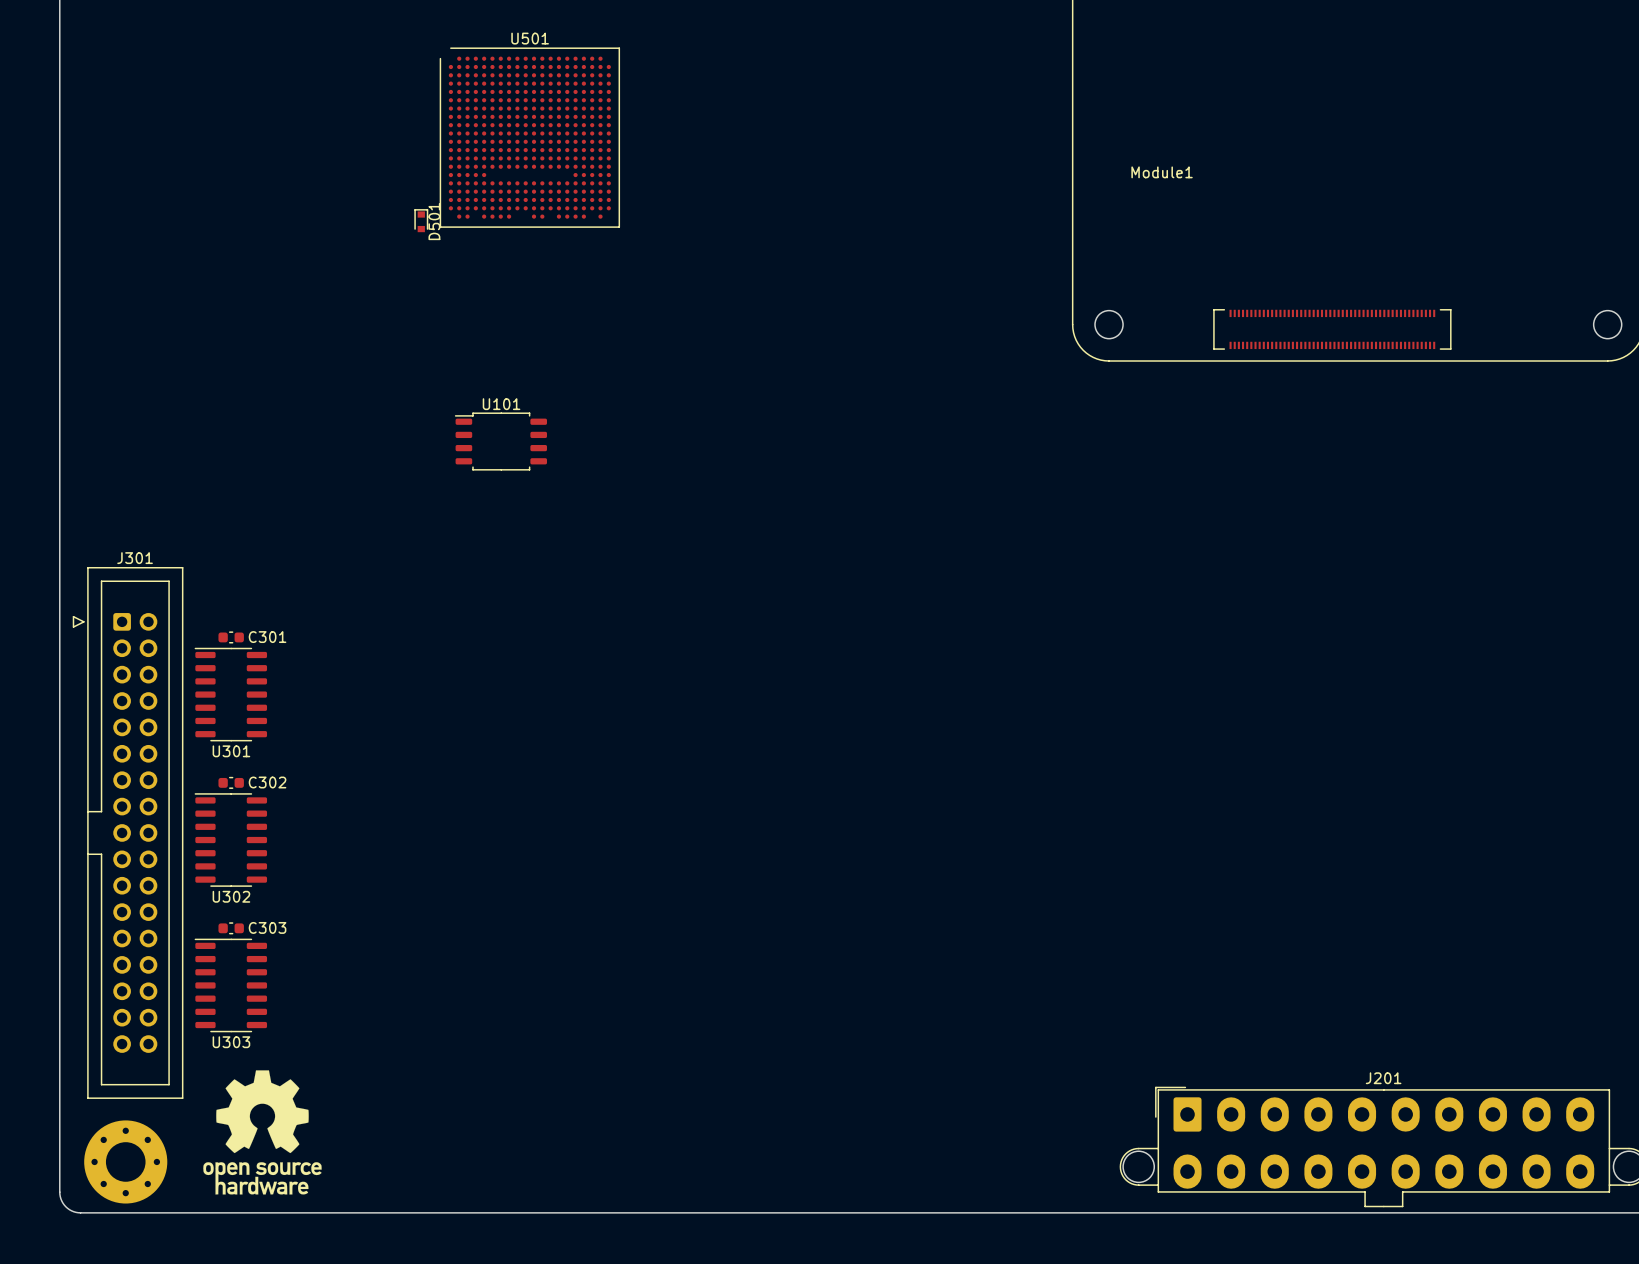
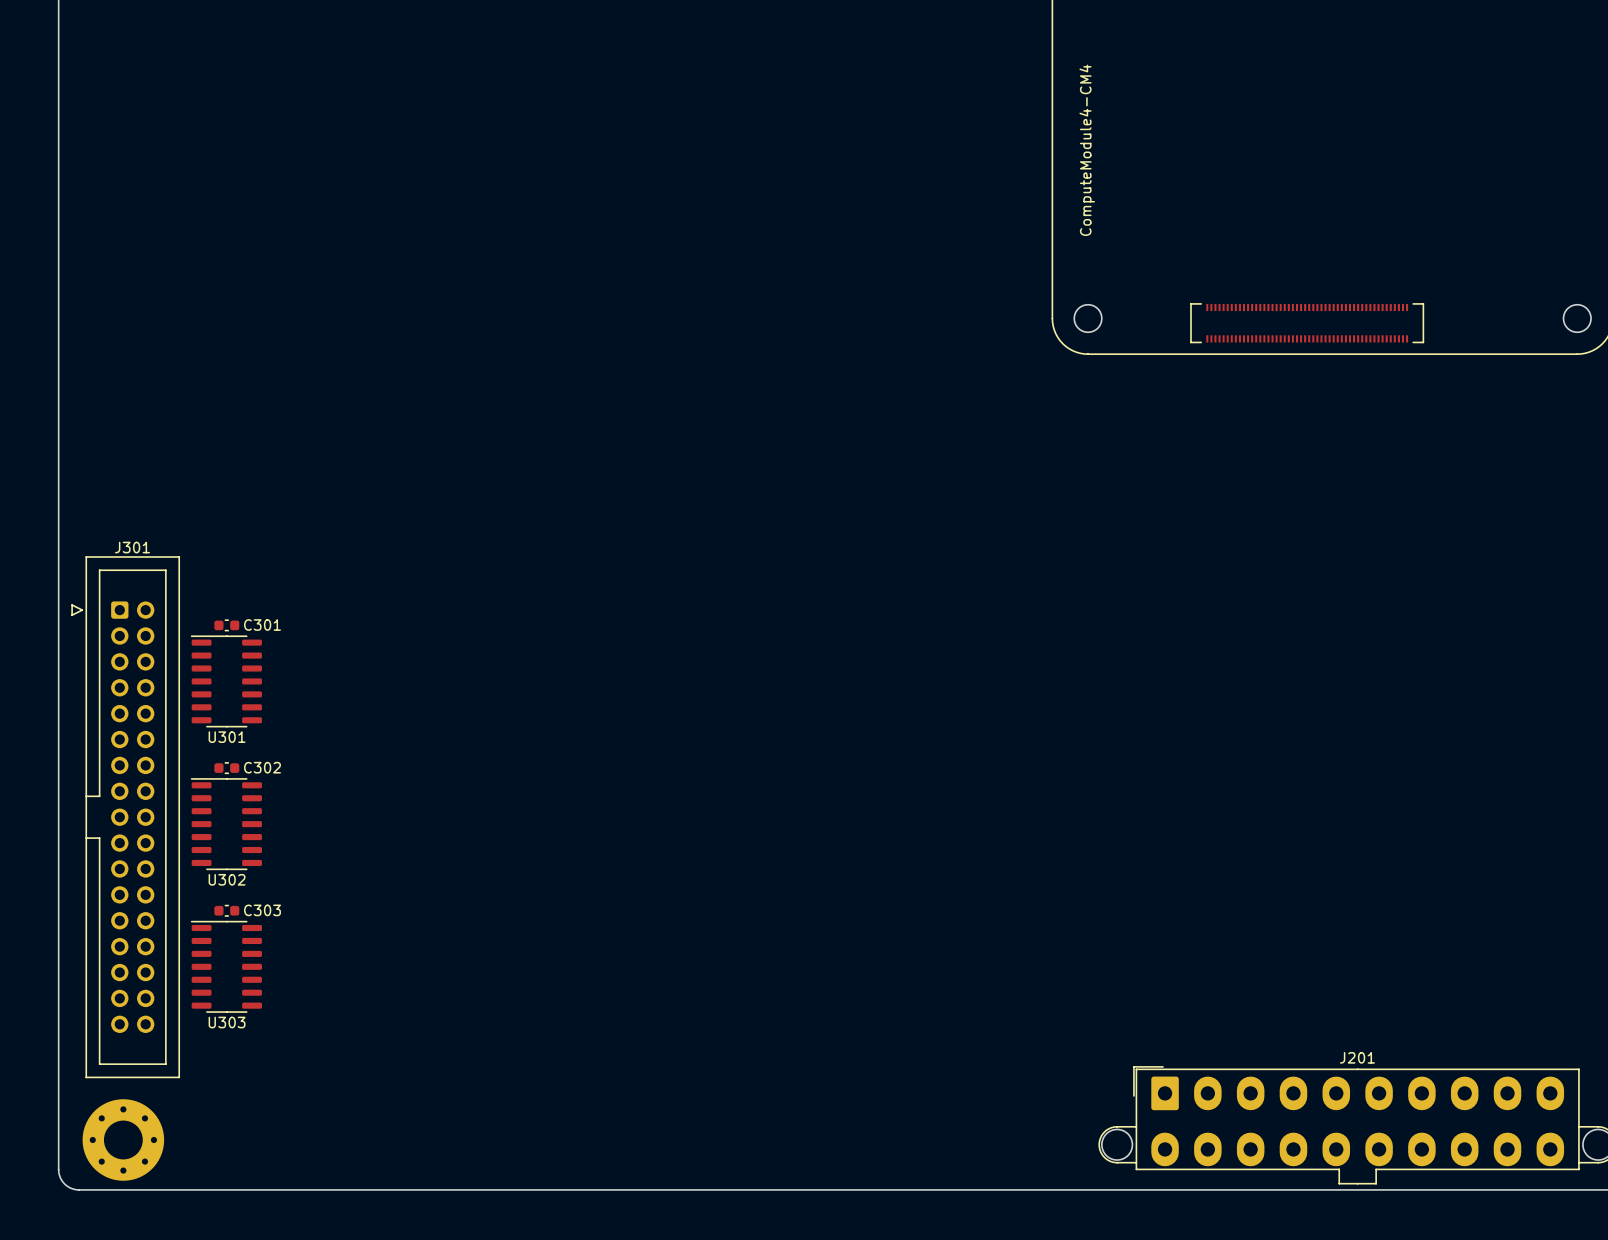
U501: (529, 137) -> none
Module1 value: none -> ComputeModule4-CM4 (1087, 150)
Module1 name: Module1 (1162, 172) -> none
D501: (421, 220) -> none
U101: (500, 441) -> none
drawing: [203, 1070, 322, 1195] -> none

